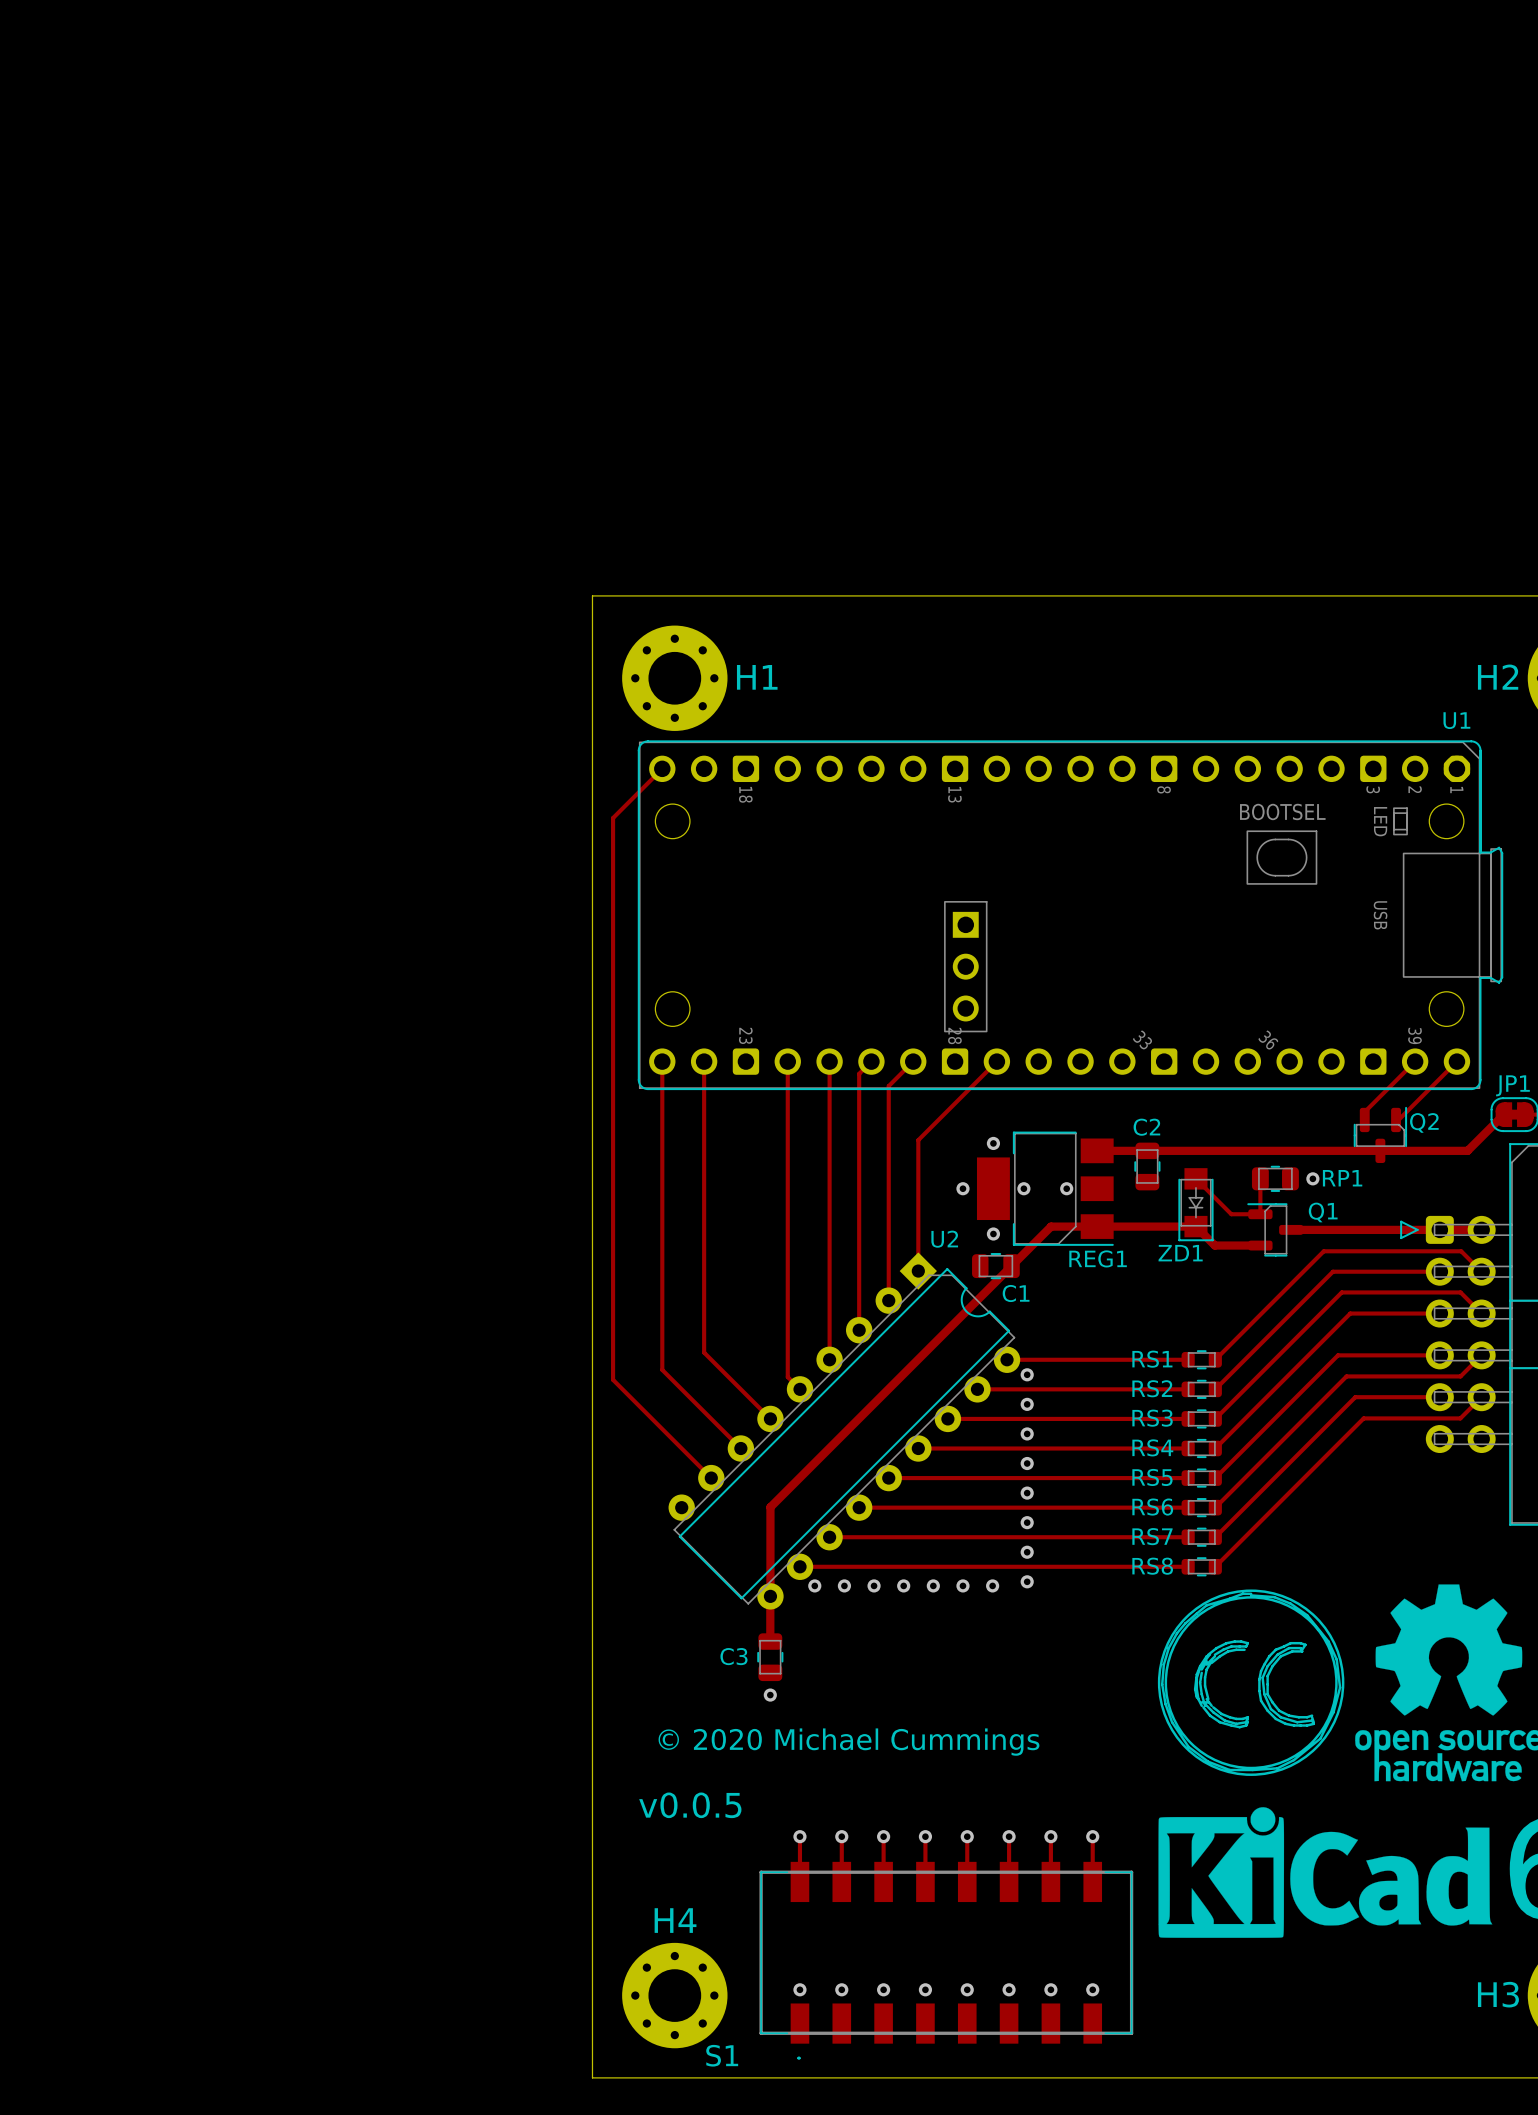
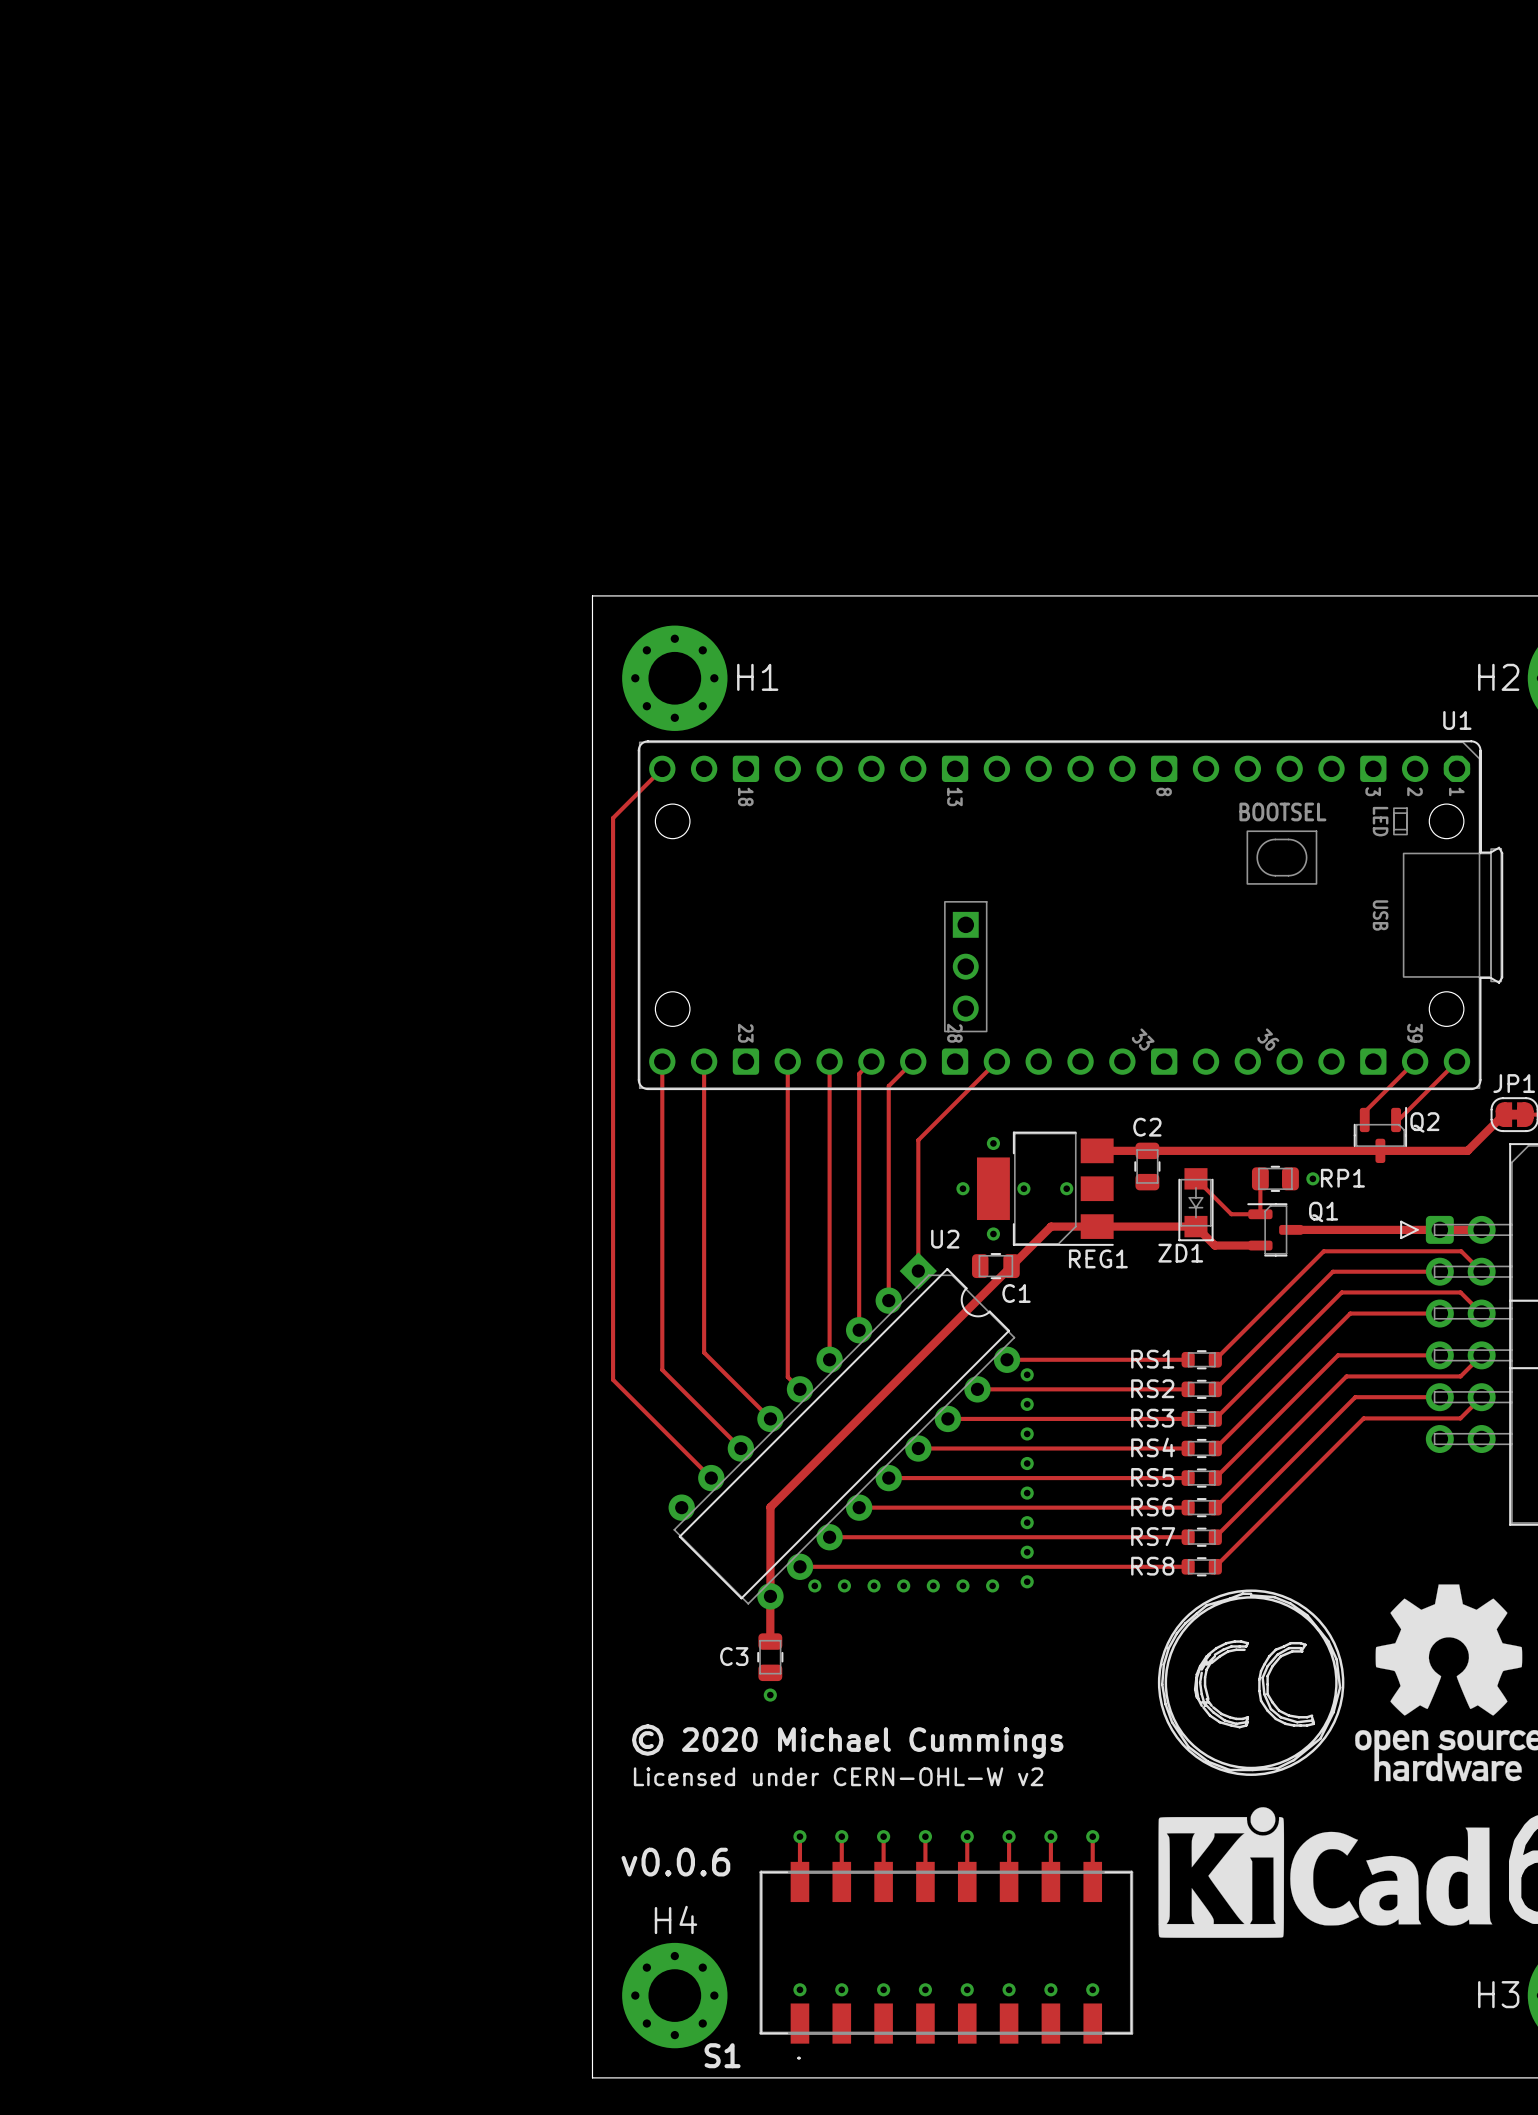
text: none -> Licensed under CERN-OHL-W v2 (838, 1776)
text: v0.0.5 (690, 1805) -> none
text: none -> v0.0.6 (675, 1862)

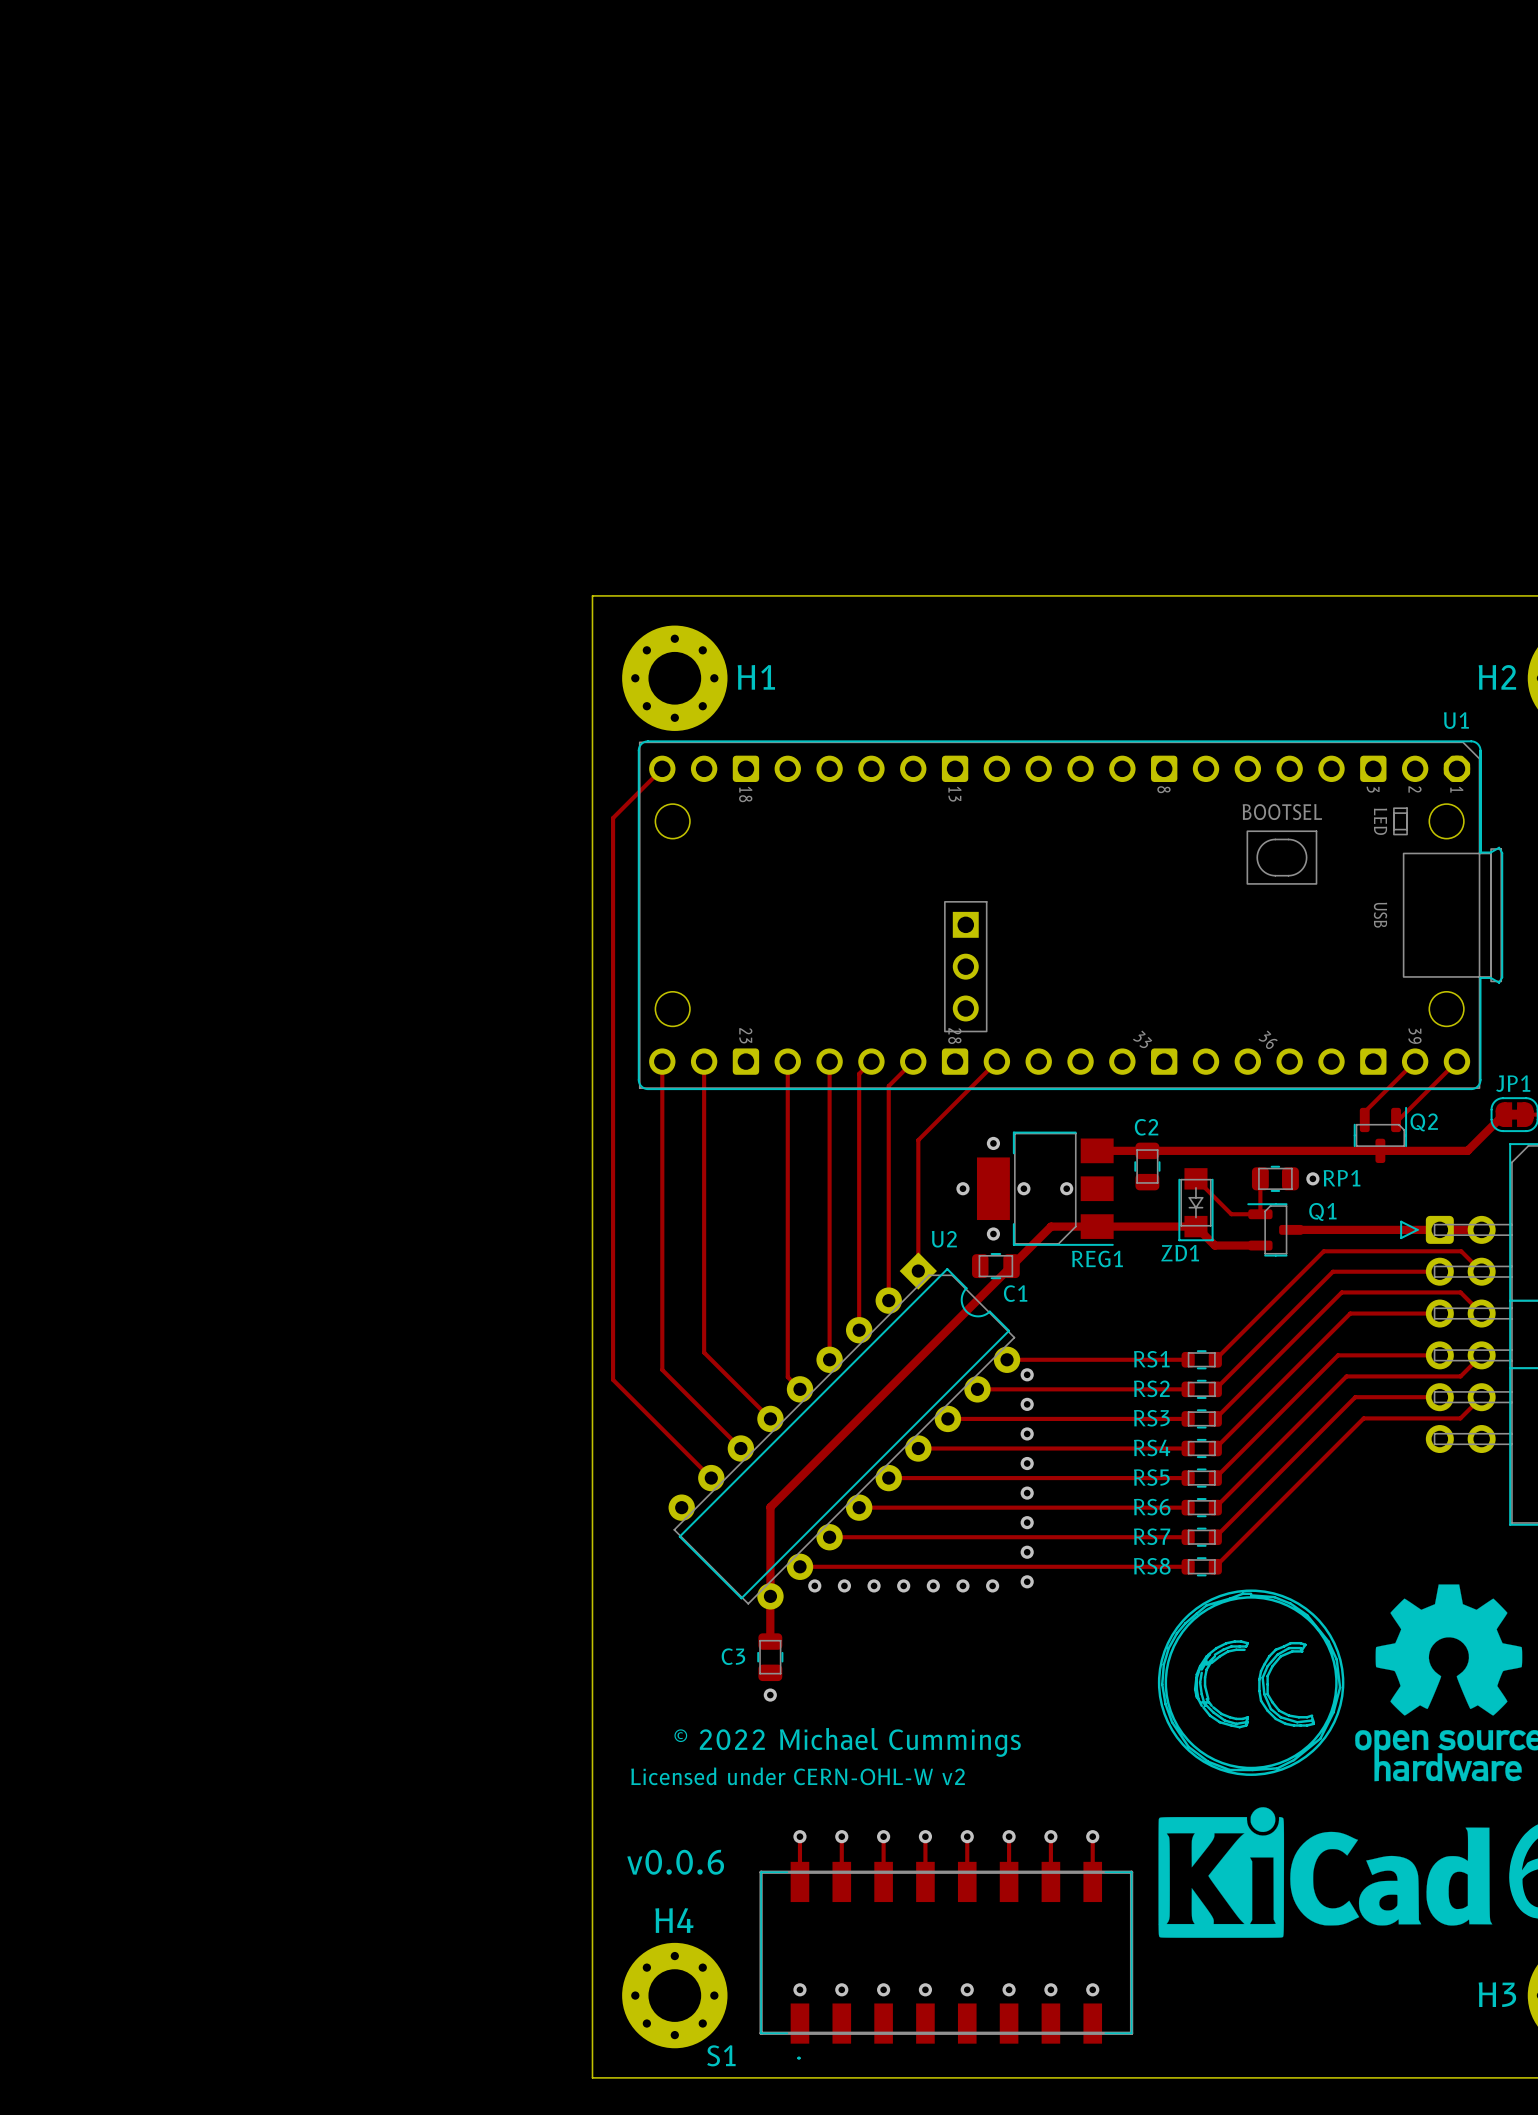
text: © 2020 Michael Cummings (847, 1741) -> © 2022 Michael Cummings (847, 1742)

